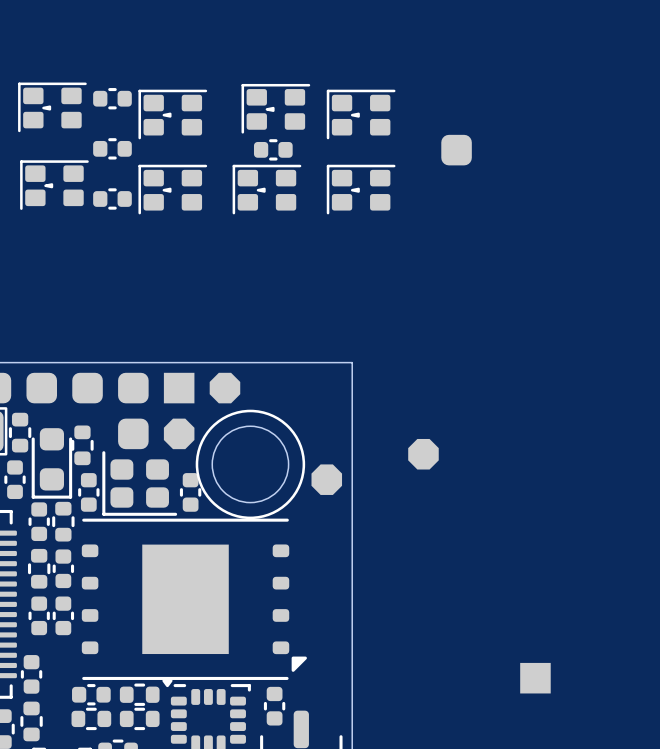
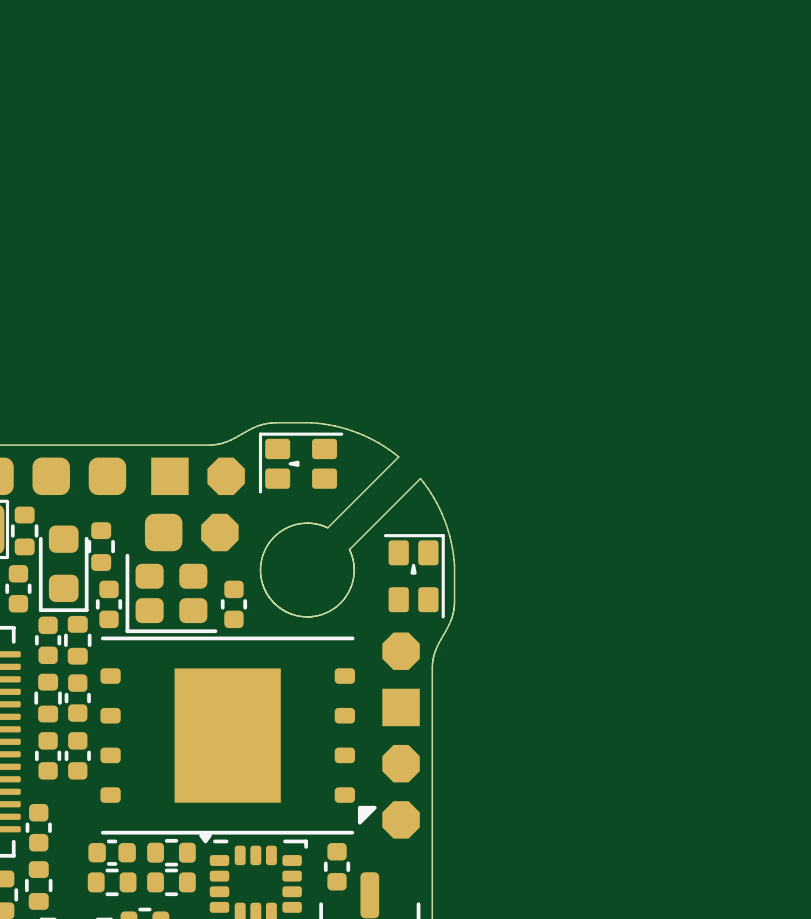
part: (112, 98) -> none
part: (52, 107) -> none
part: (275, 108) -> none
part: (172, 114) -> none
part: (361, 114) -> none
part: (112, 148) -> none
part: (273, 149) -> none
part: (456, 150) -> none
part: (54, 185) -> none
part: (172, 189) -> none
part: (266, 189) -> none
part: (361, 189) -> none
part: (112, 198) -> none
board edge: (170, 362) (352, 362) (352, 544) -> (260, 570) (262, 582) (266, 593) (274, 603) (284, 610) (296, 615) (308, 616) (319, 615) (331, 610) (345, 597) (352, 582) (354, 566) (349, 549) (420, 478) (434, 498) (444, 519) (451, 542) (454, 565) (453, 611) (449, 624) (435, 650) (432, 668)
board edge: none -> (208, 445) (227, 441) (253, 427) (265, 423) (311, 422) (335, 426) (357, 432) (379, 443) (398, 456) (327, 527) (315, 523) (302, 523) (289, 526) (277, 533) (265, 549) (260, 568)
part footprint: [118, 372, 149, 404] -> [151, 457, 189, 496]
part footprint: [163, 372, 195, 404] -> [207, 457, 245, 496]
part: none -> (301, 463)
part: (224, 388) -> none
drawing: [195, 409, 306, 520] -> none
round board edge: [211, 425, 290, 504] -> none
part: (423, 454) -> none
part footprint: [311, 464, 343, 495] -> [383, 534, 445, 619]
part: none -> (401, 651)
part: none -> (401, 763)
part: none -> (401, 819)
part position: (535, 678) -> (401, 707)

